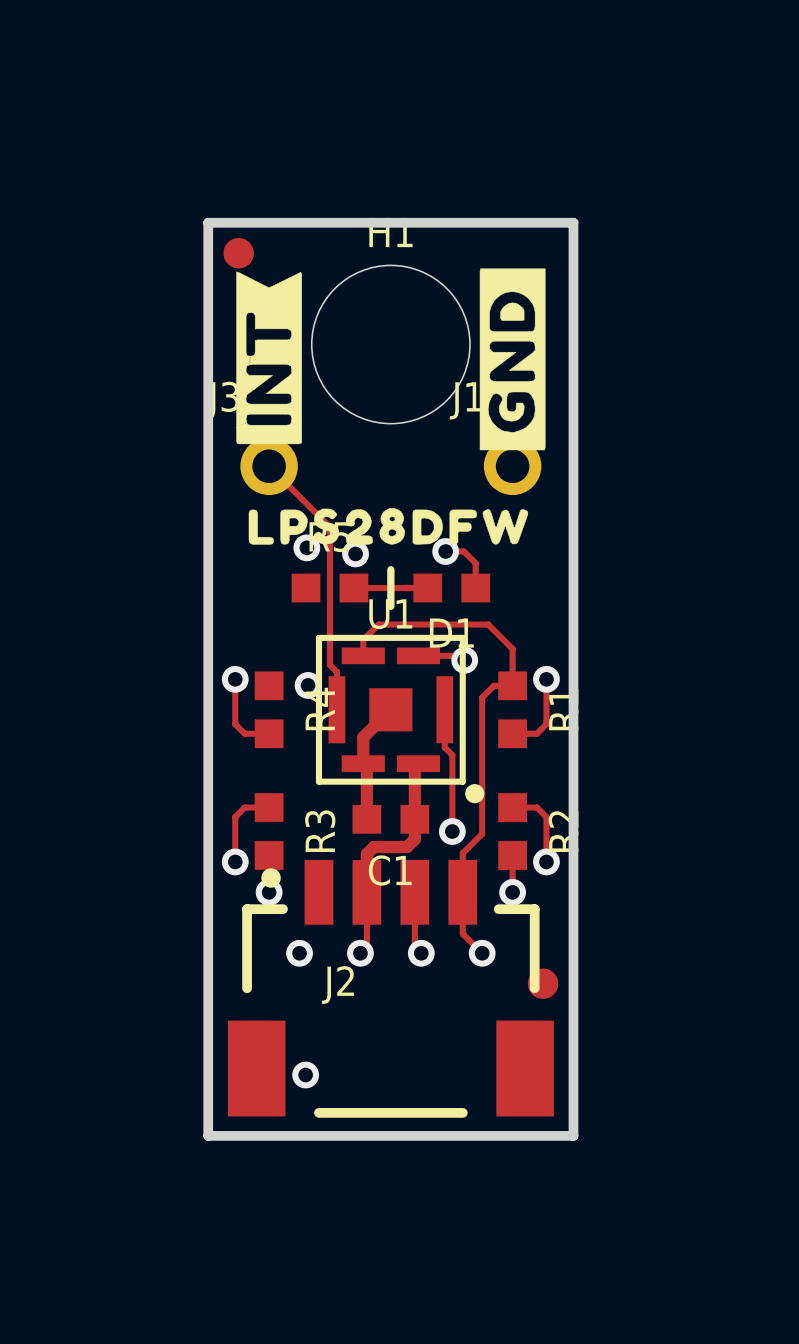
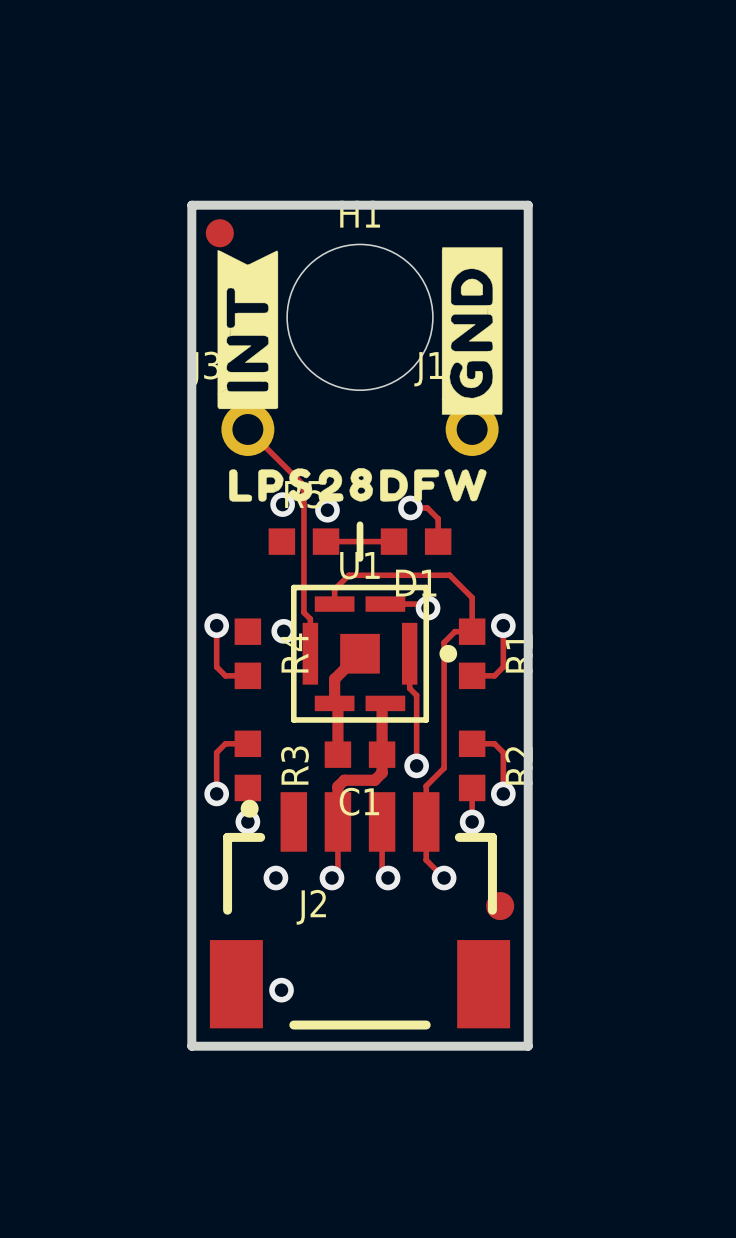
U1 footprint: [315, 634, 485, 804] -> [290, 584, 458, 723]

